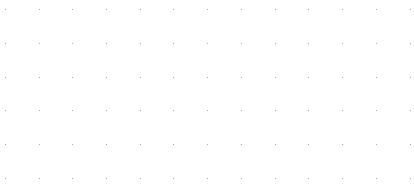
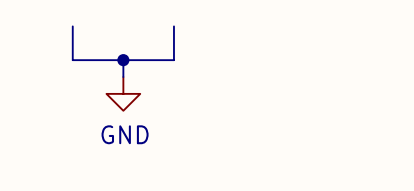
wire: none -> (72, 26) (72, 60) (173, 60) (173, 26)
wire: none -> (123, 60) (123, 77)
junction: none -> (123, 60)
power symbol: none -> GND (123, 93)

